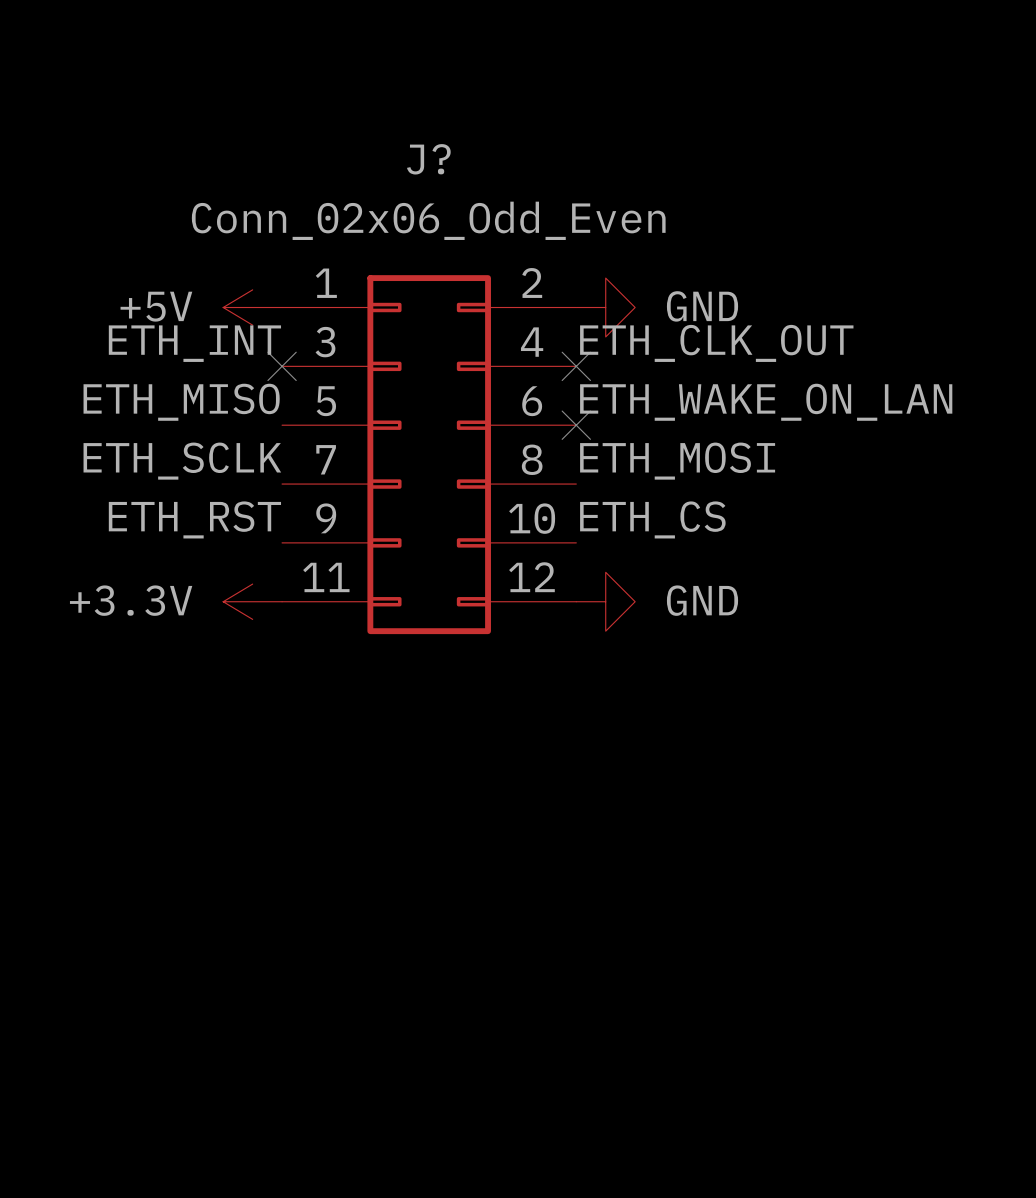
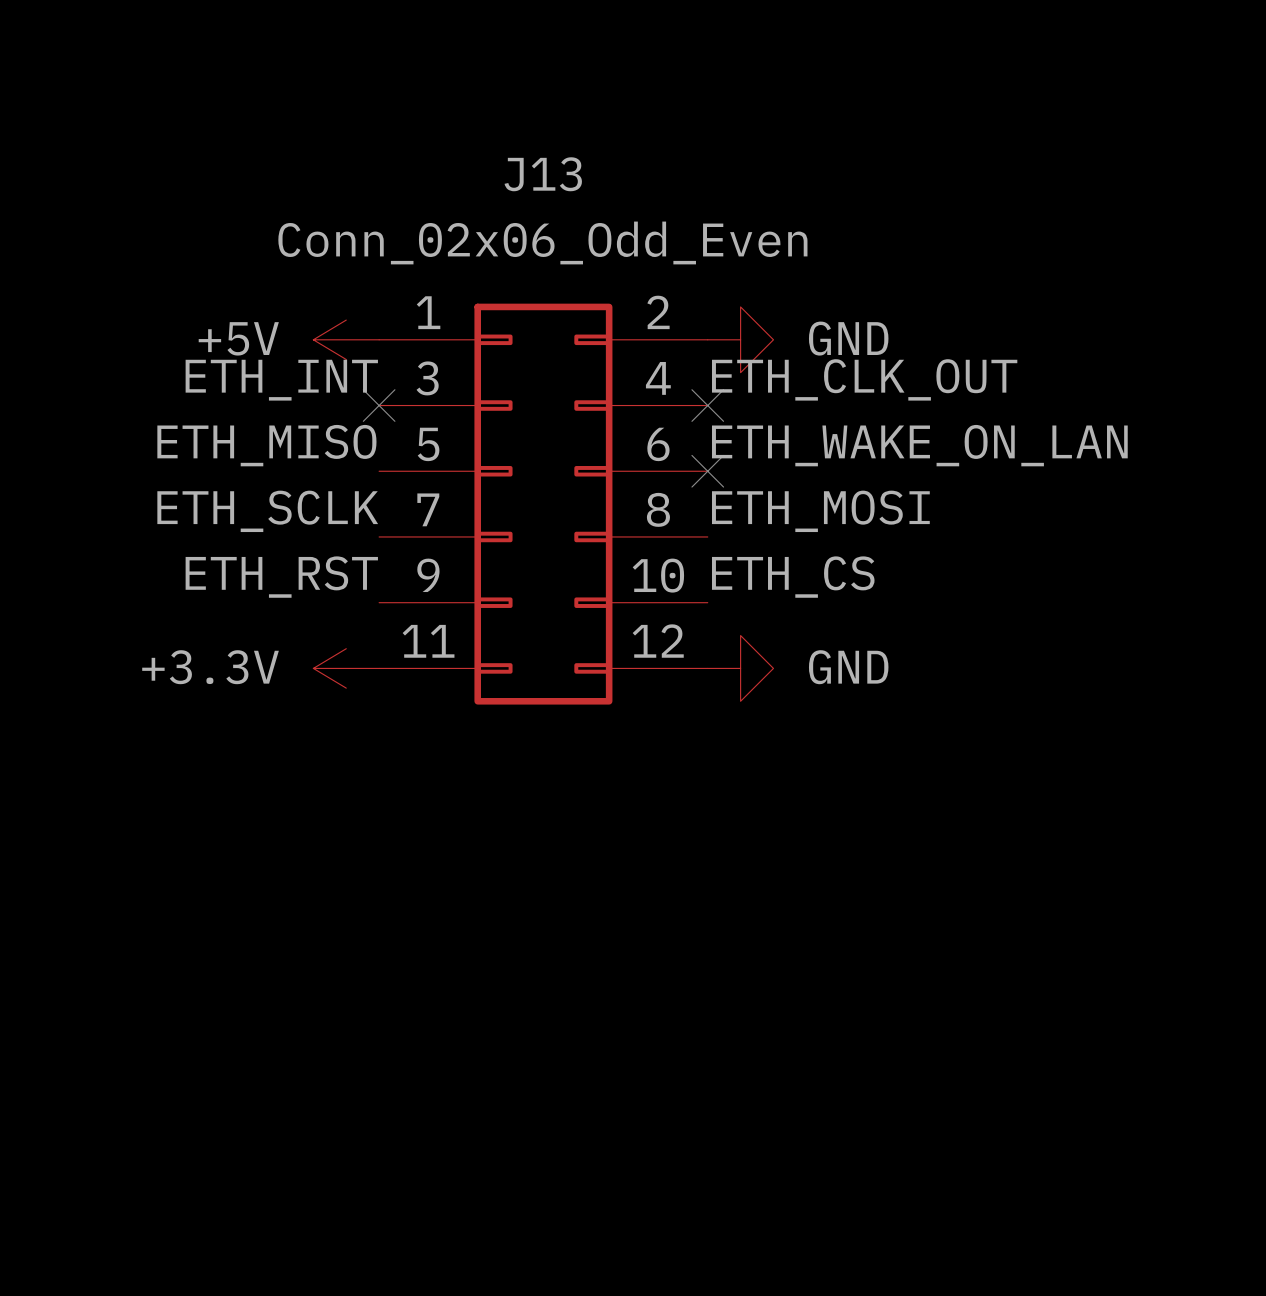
J? name: J? (428, 159) -> J13 (543, 174)

